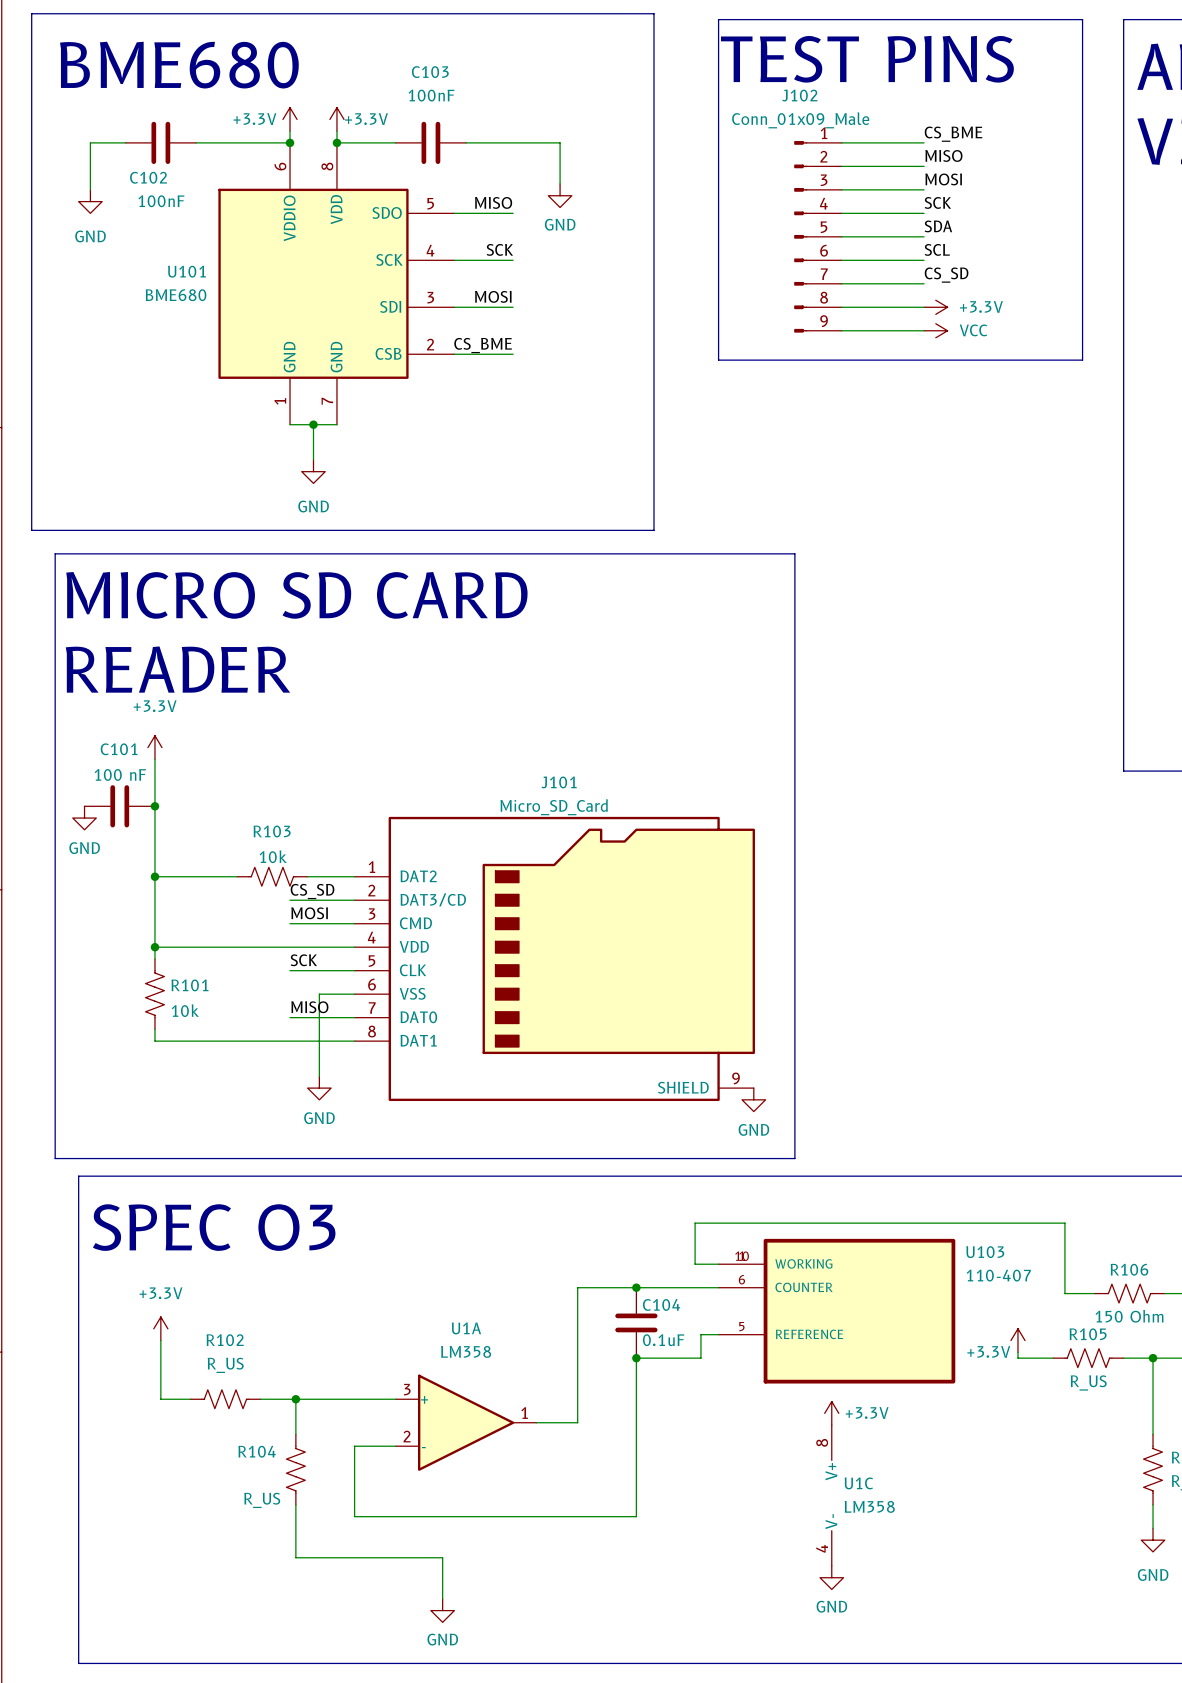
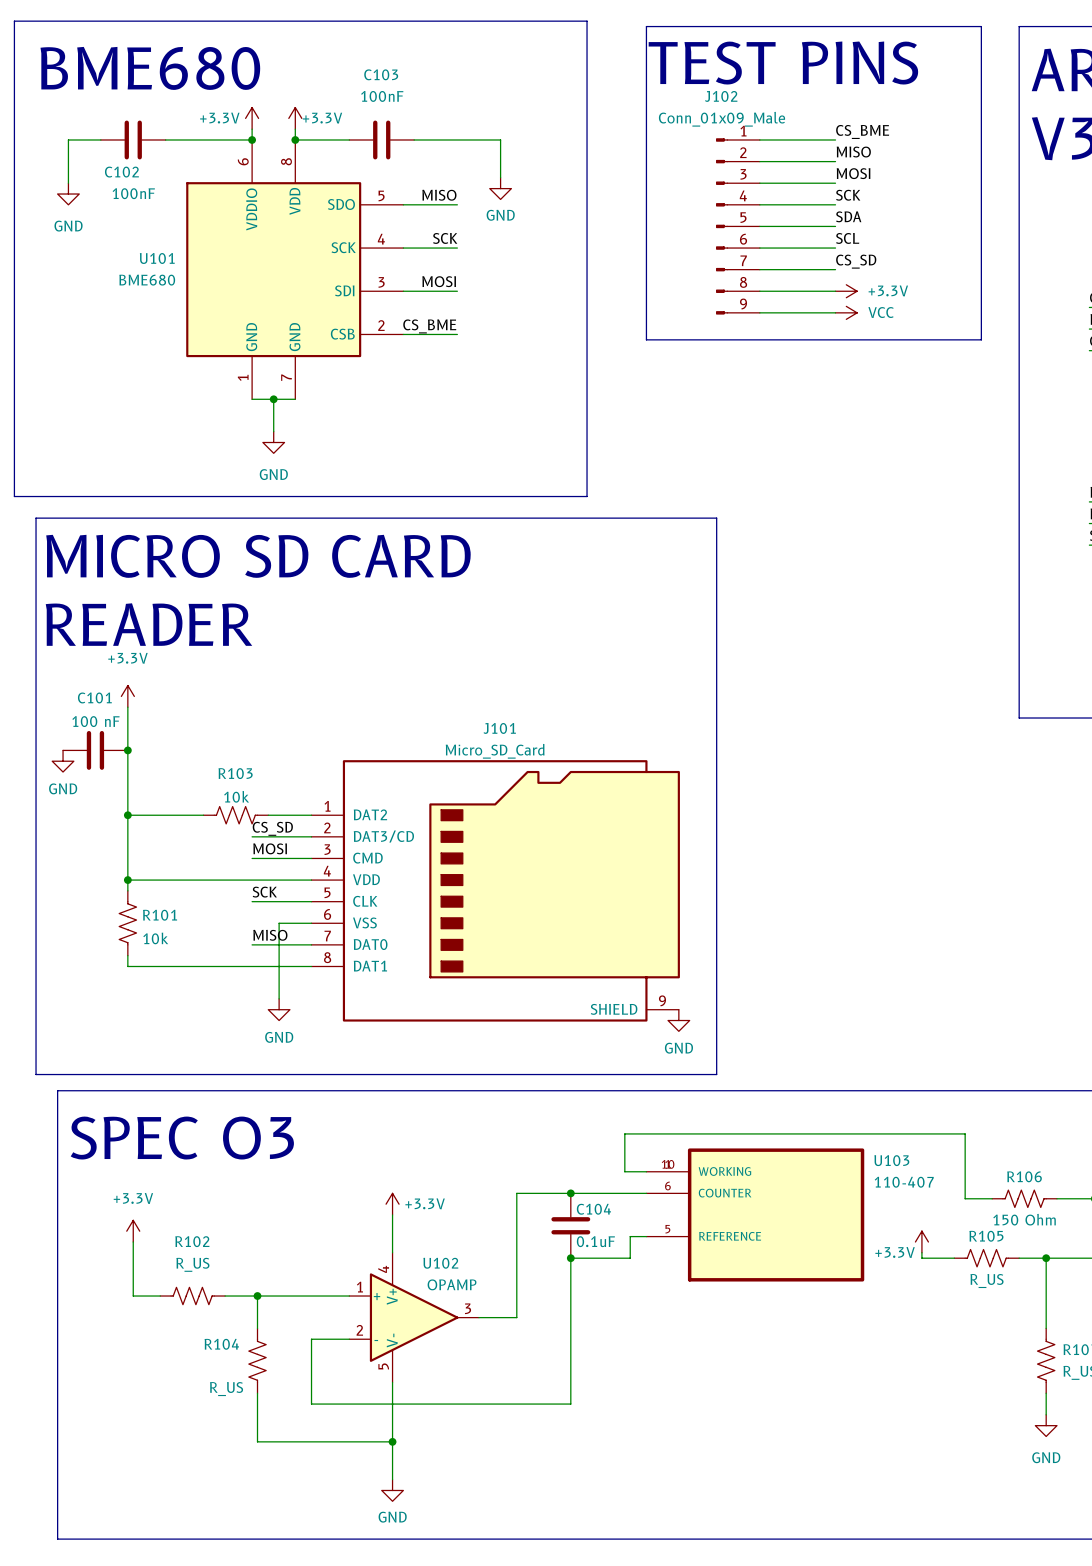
power symbol: none -> +3.3V (392, 1204)
wire: none -> (392, 1214) (392, 1252)
power symbol: +3.3V (831, 1413) -> none
U1A: LM358 (466, 1422) -> none
U102: none -> OPAMP (414, 1317)
wire: none -> (392, 1382) (392, 1441)
U1C: LM358 (831, 1495) -> none
junction: none -> (392, 1441)
power symbol: GND (831, 1577) -> none

